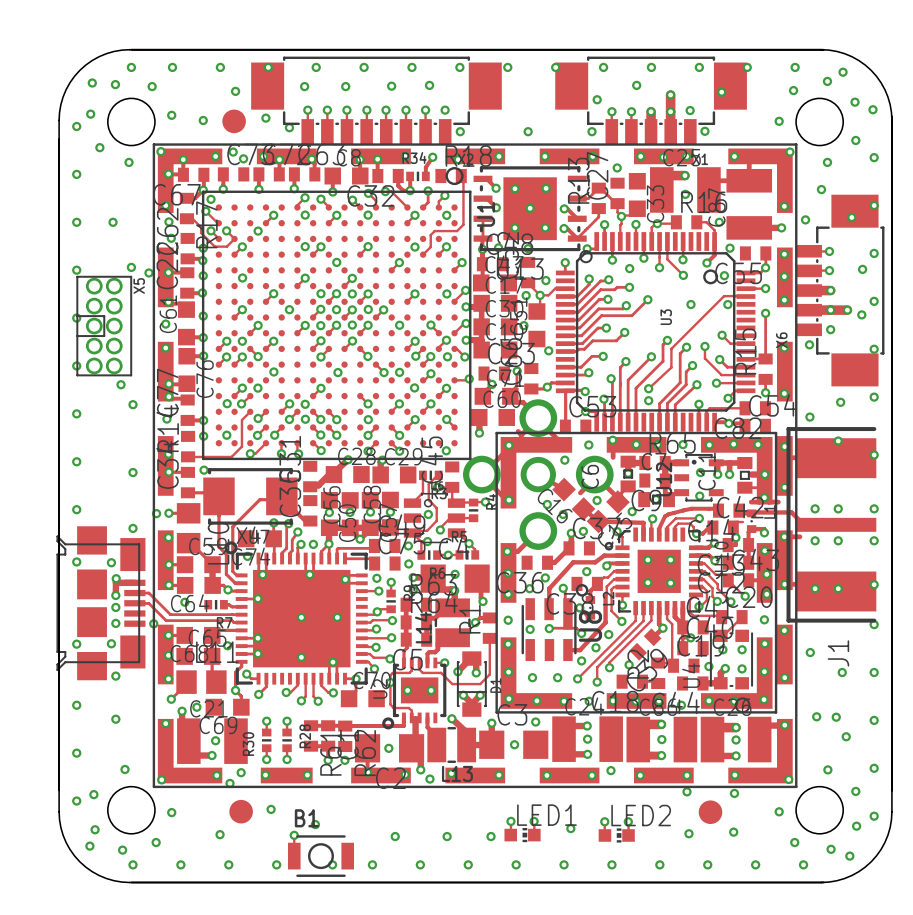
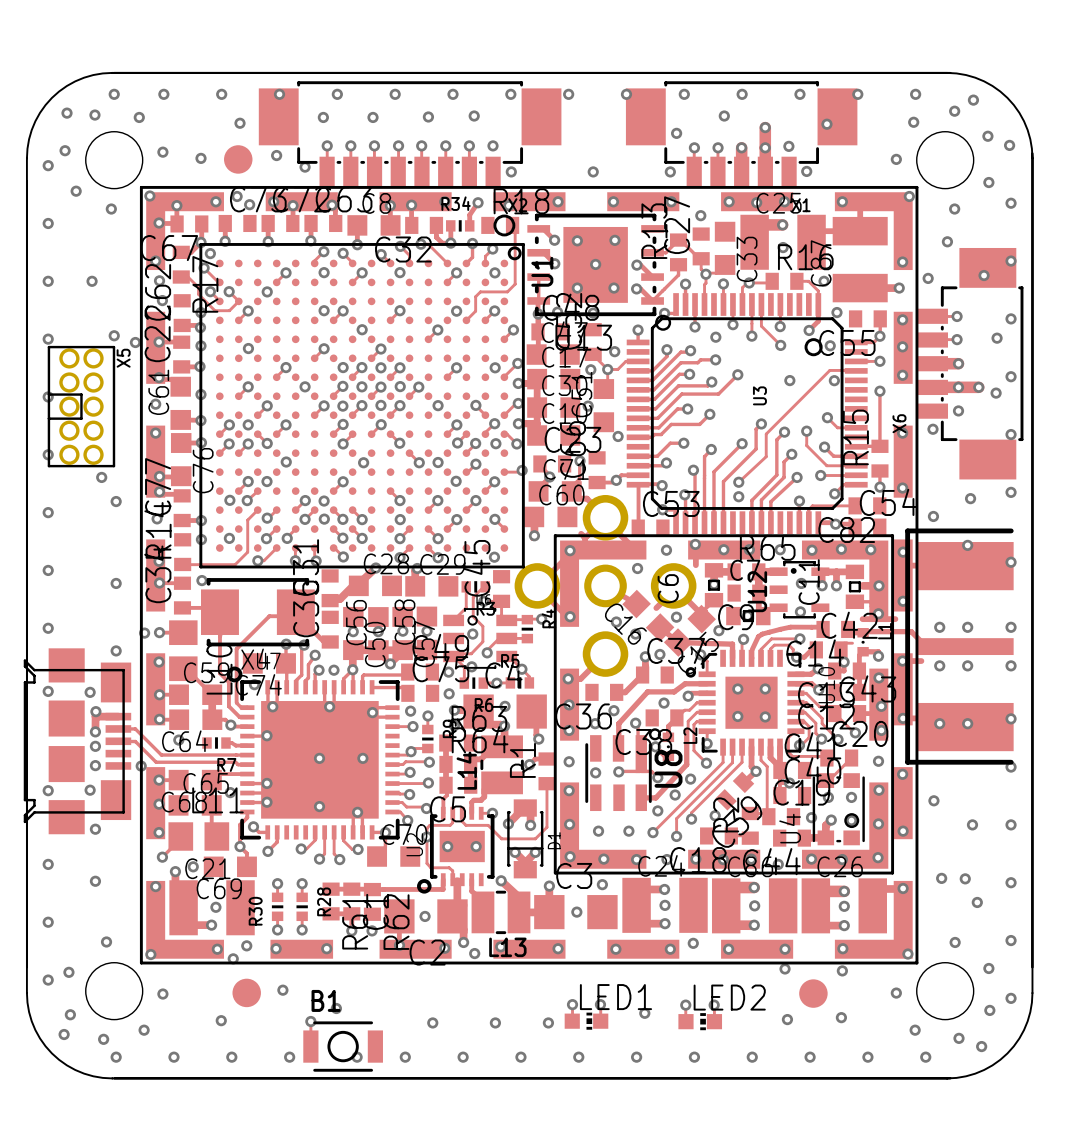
drawing: none -> [507, 246, 522, 261]
U8 footprint: [521, 584, 589, 662] -> [585, 728, 662, 812]
U4 footprint: [709, 629, 754, 714] -> [812, 773, 865, 846]
J1 name: J1 (838, 653) -> none

